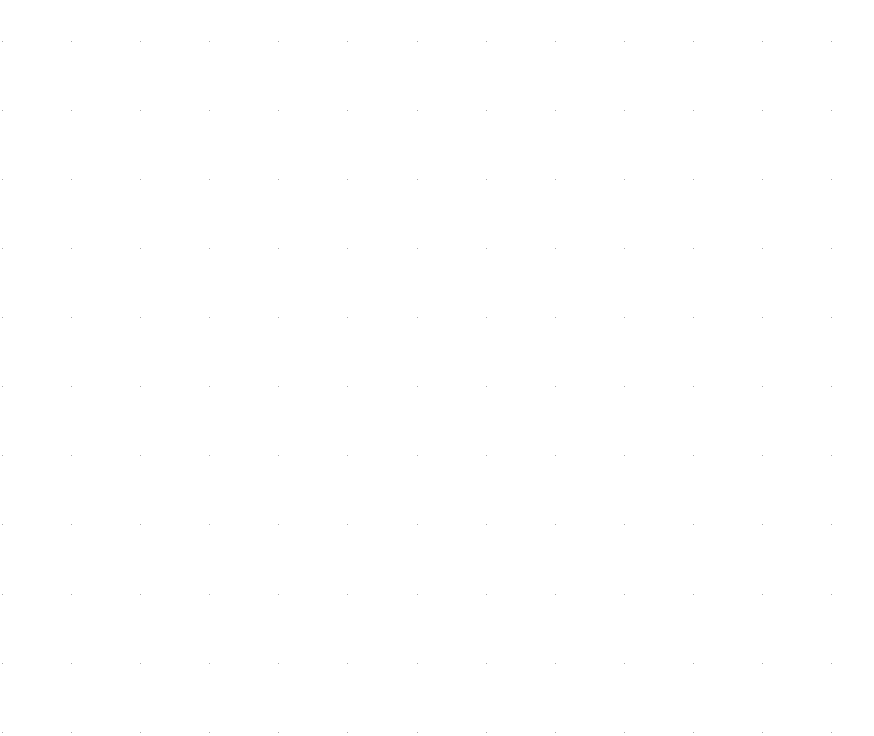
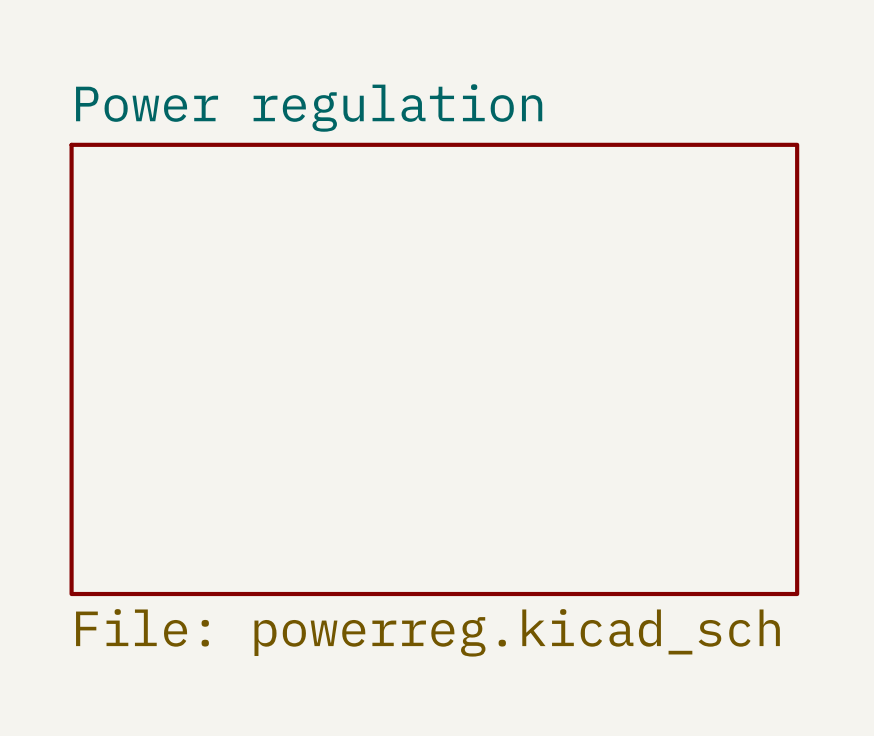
sheet Power regulation: none -> File: powerreg.kicad_sch (434, 369)

